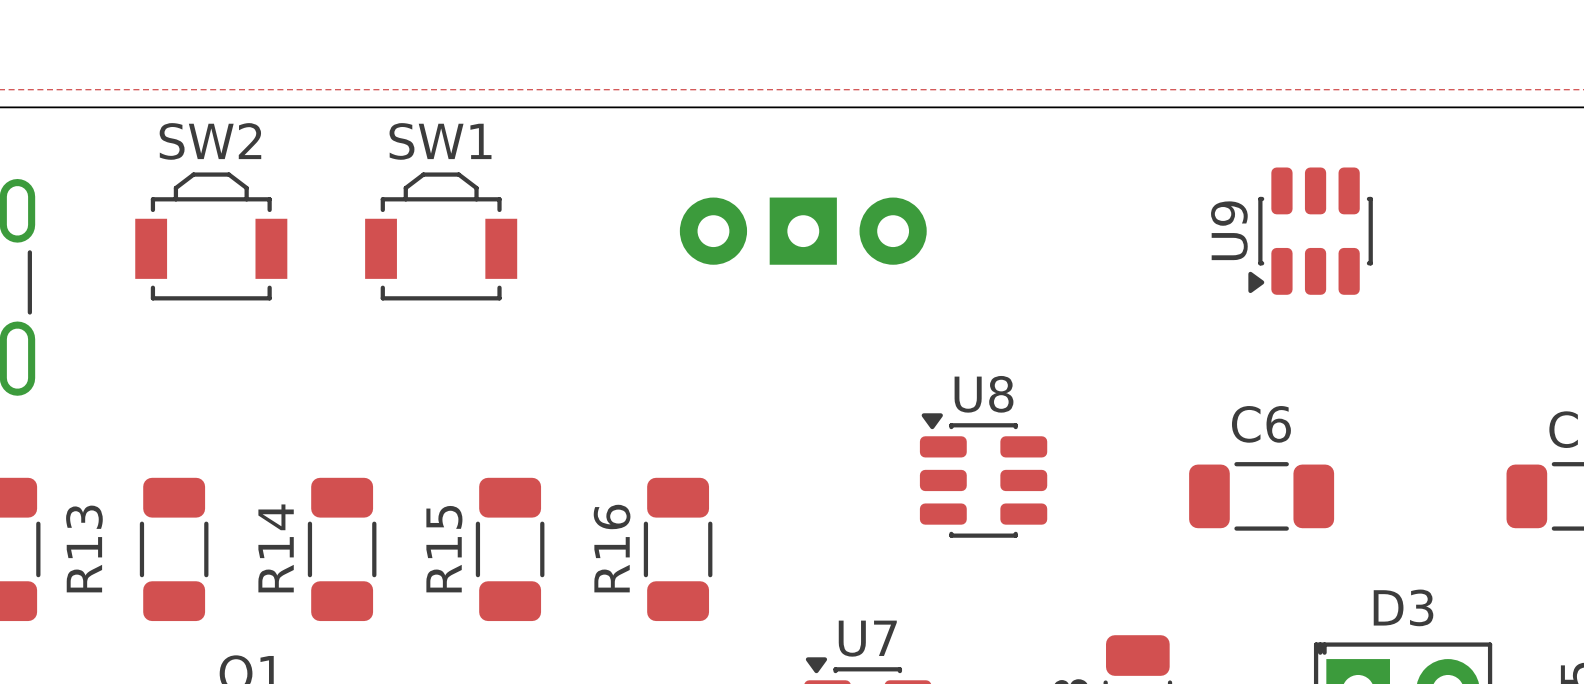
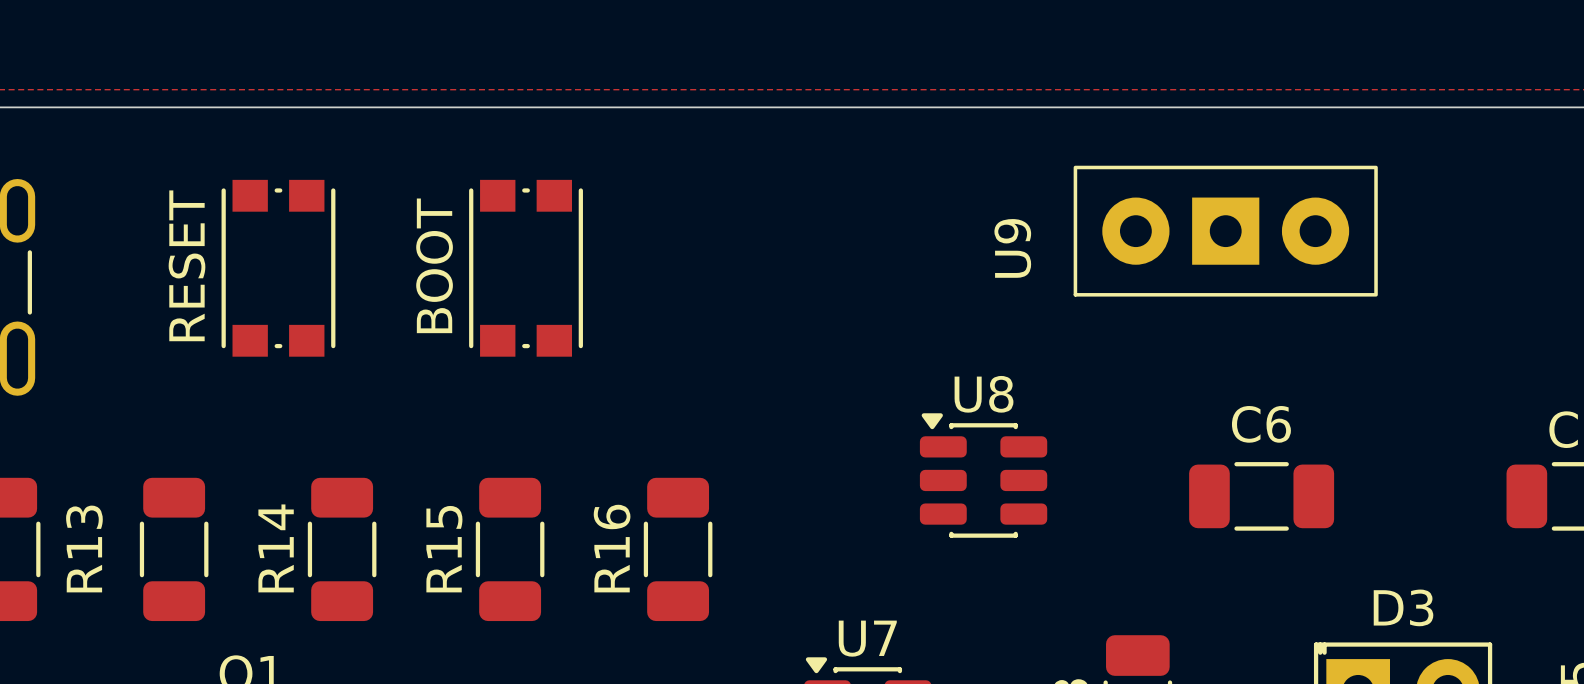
U9 footprint: [1248, 167, 1373, 295] -> [1073, 165, 1378, 297]
U9 name position: U9 (1229, 230) -> U9 (1012, 248)
part: (803, 231) -> none
SW2: (211, 236) -> none
SW1: (441, 236) -> none
part: none -> RESET (278, 268)
part: none -> BOOT (526, 268)

